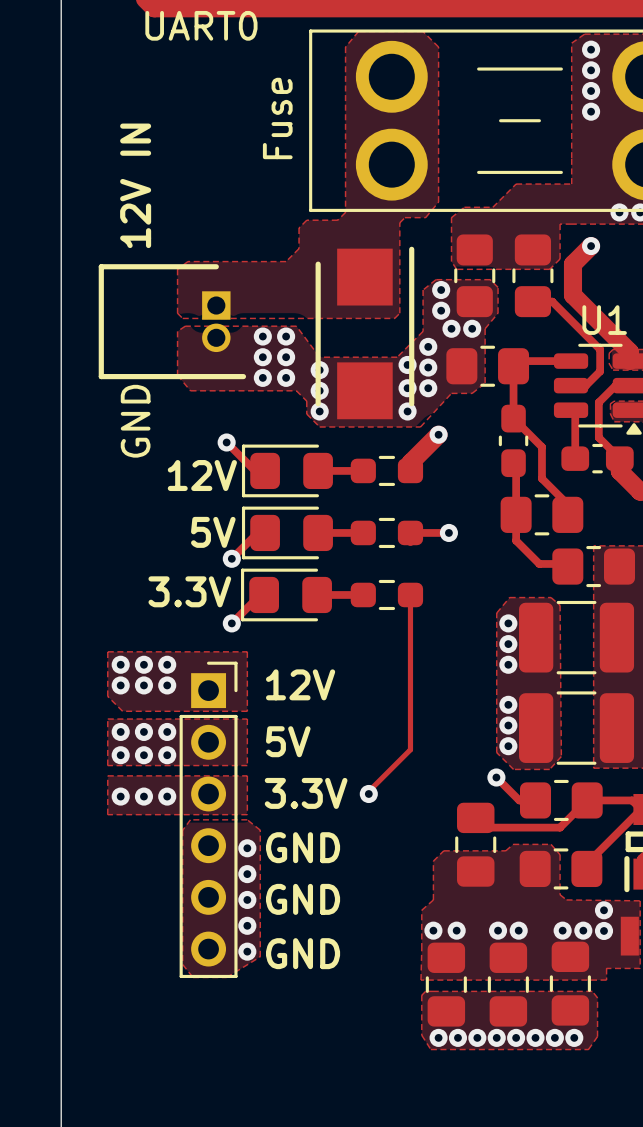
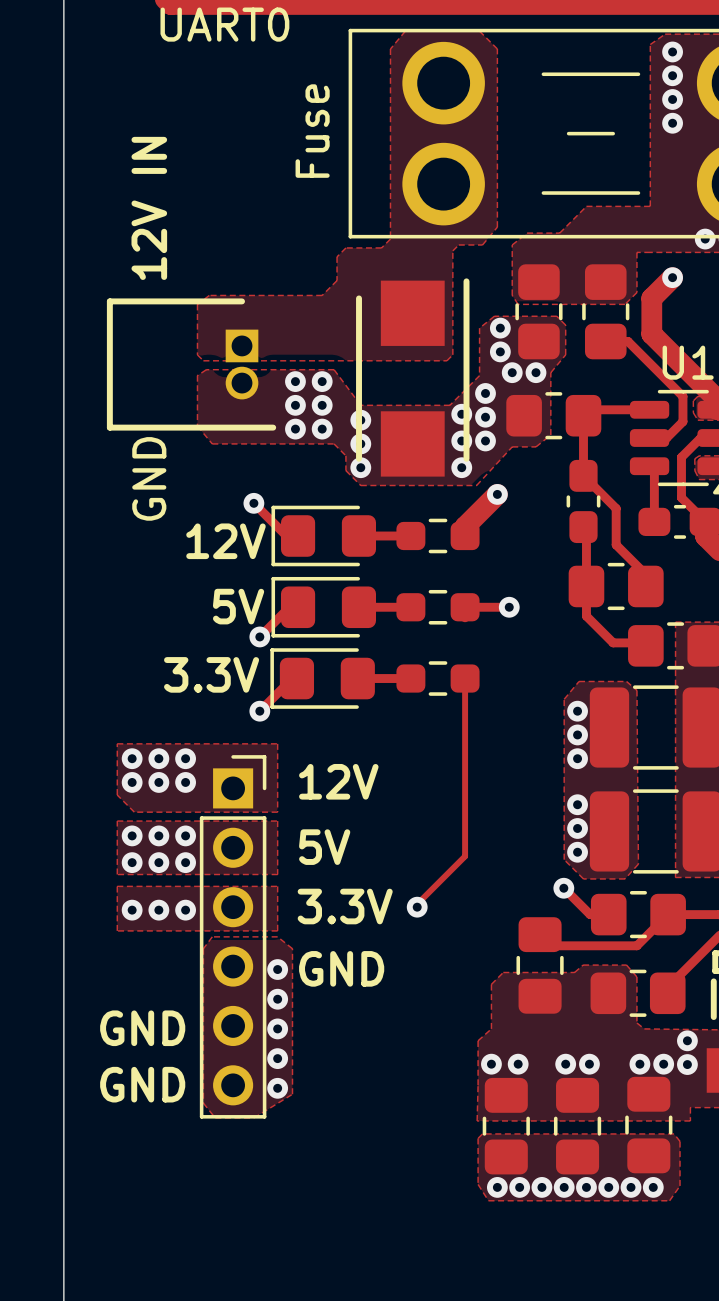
text: none -> GND (142, 1028)
text: GND (303, 899) -> none
text: none -> GND (142, 1084)
text: GND (303, 953) -> none

